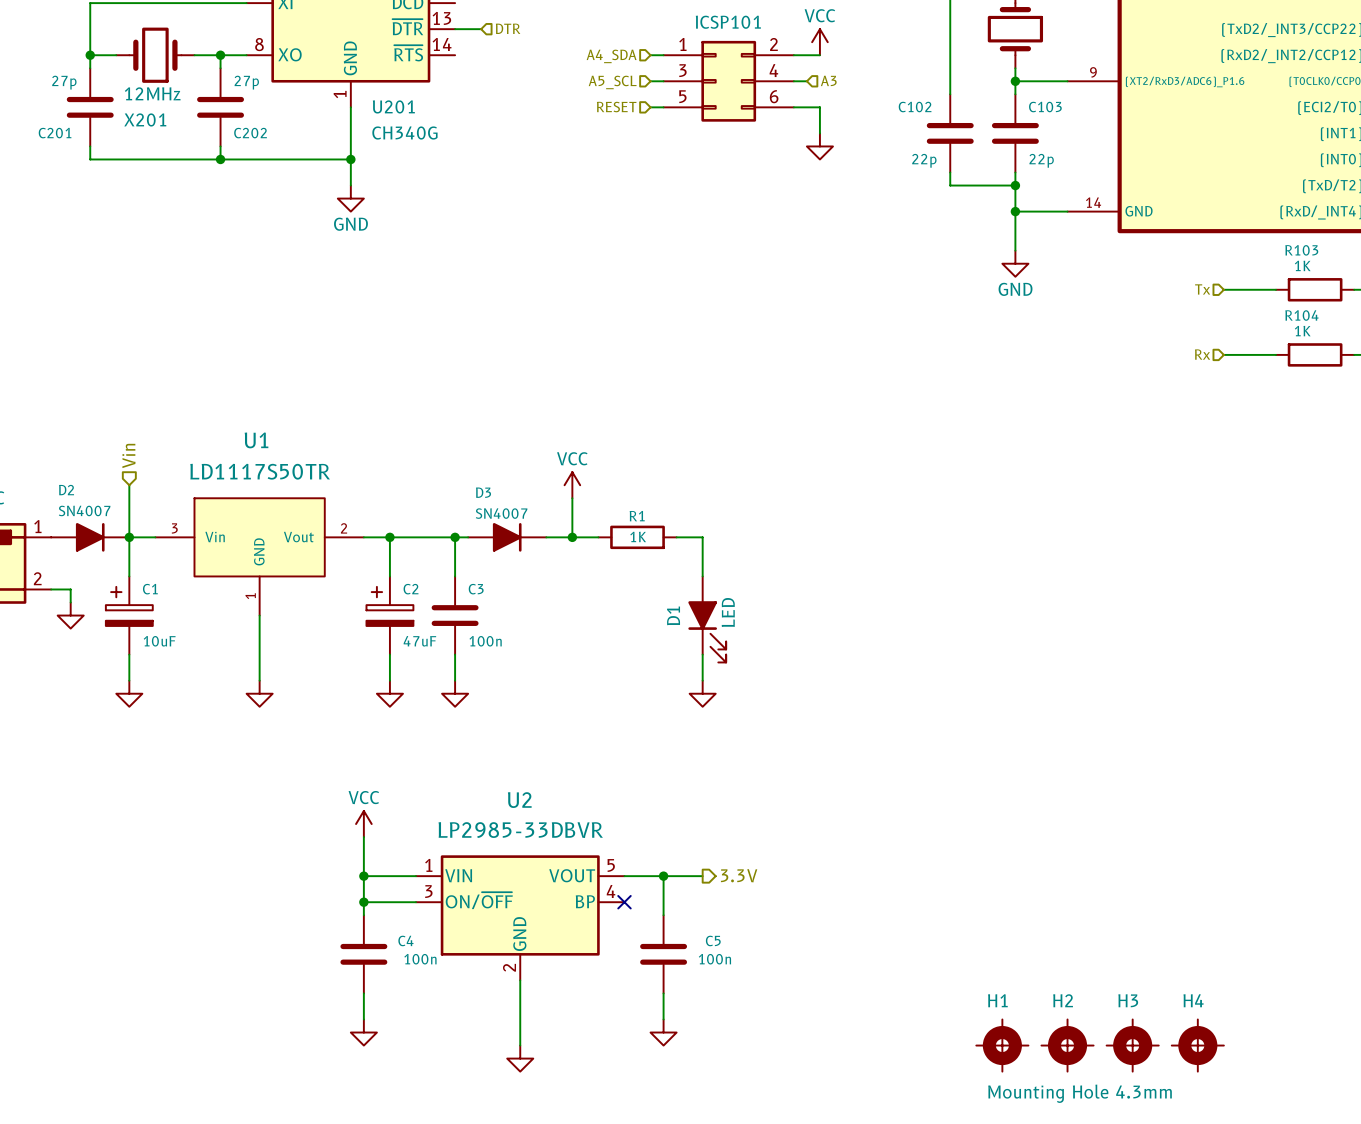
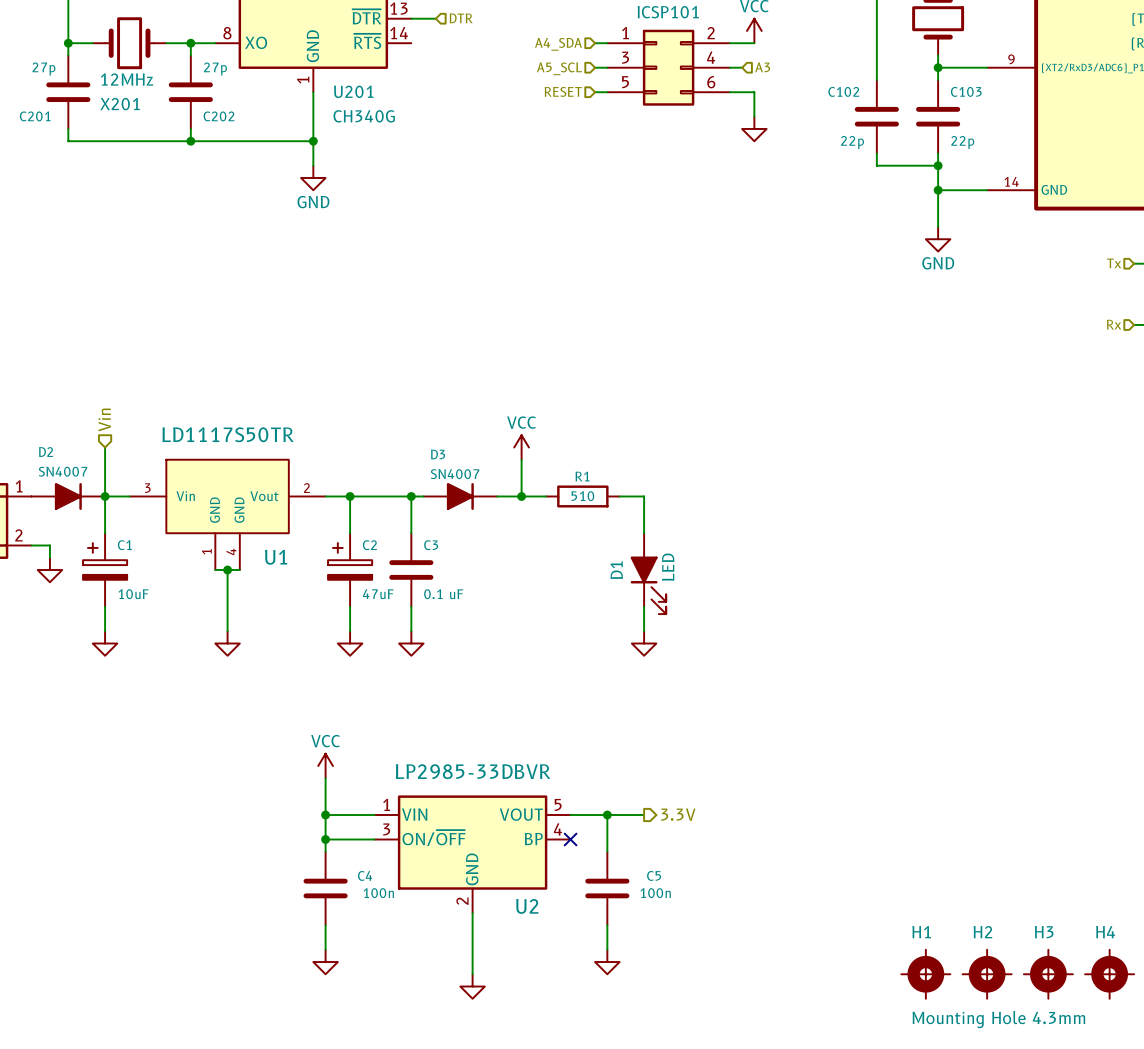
U1 name position: U1 (256, 440) -> U1 (276, 557)
U1 symbol: [155, 498, 364, 616] -> [129, 459, 326, 570]
R1 value: 1K (638, 536) -> 510 (582, 496)
wire: none -> (215, 569) (239, 569)
junction: none -> (227, 569)
C3 value: 100n (485, 641) -> 0.1 uF (443, 594)
U2 name position: U2 (519, 800) -> U2 (527, 906)

